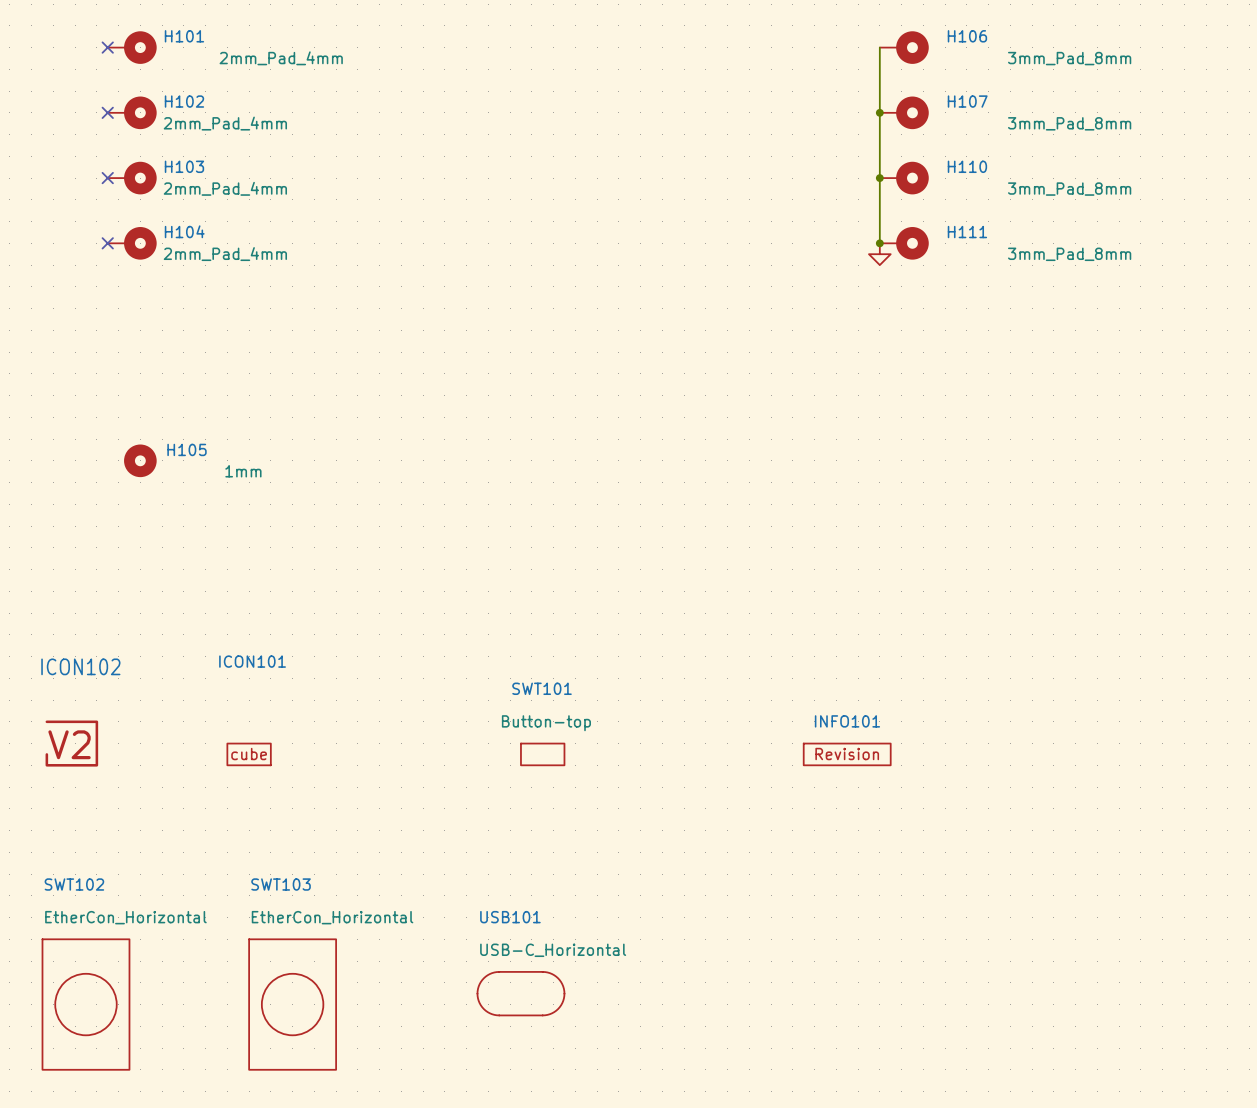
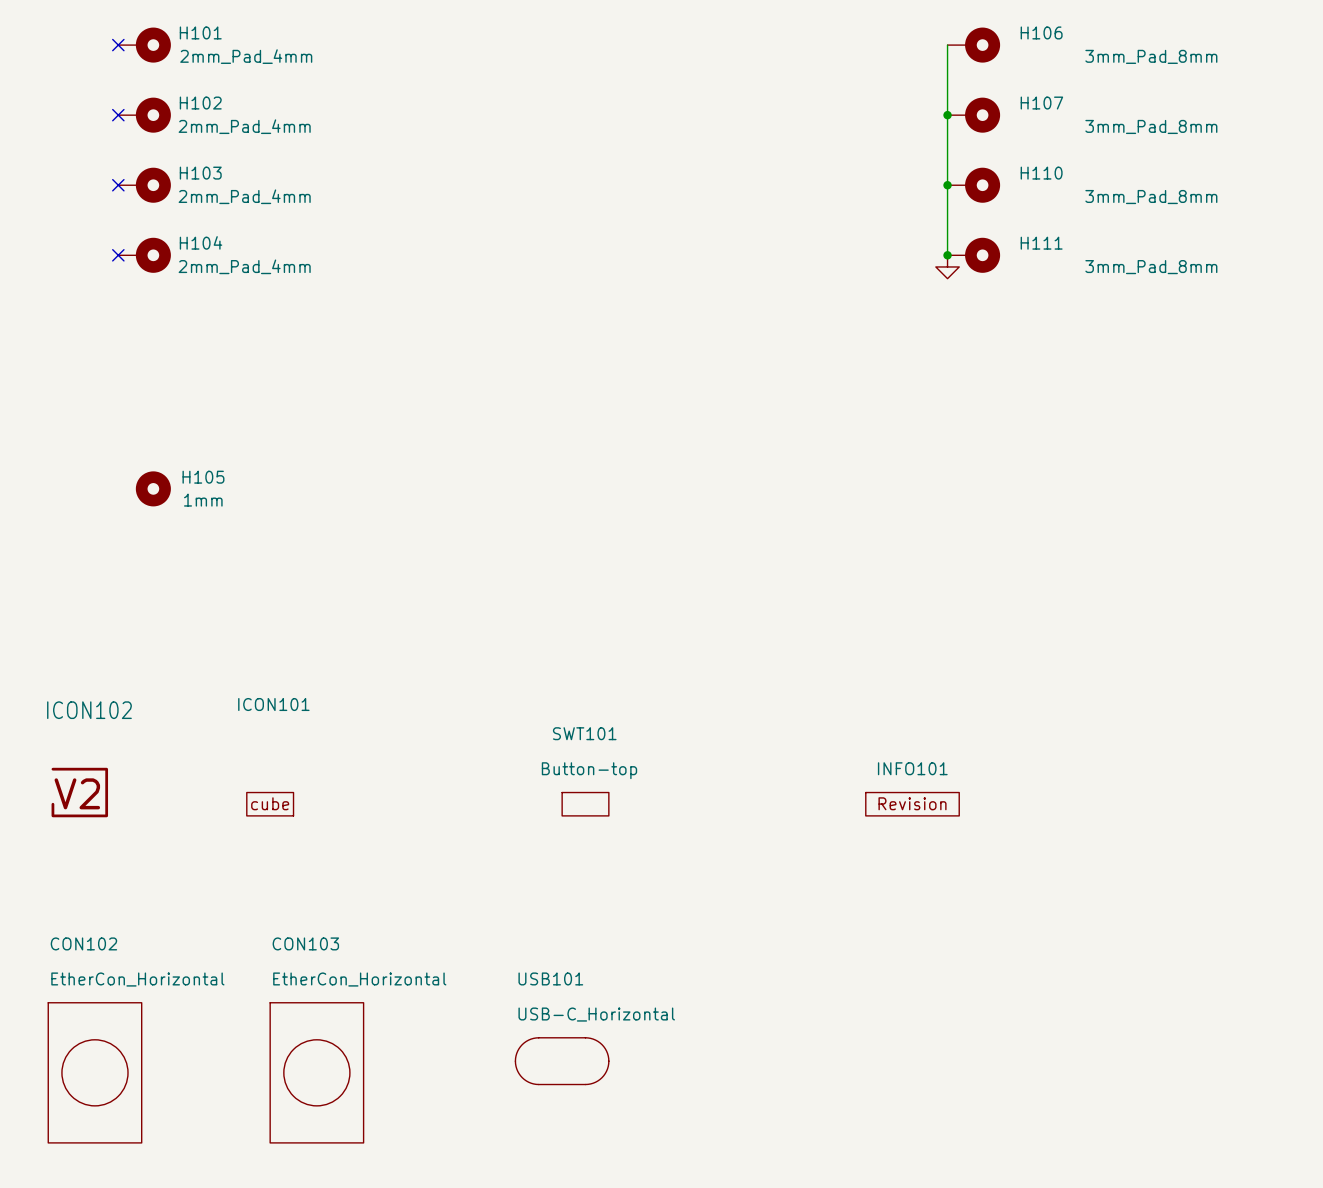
H101 value position: 2mm_Pad_4mm (281, 58) -> 2mm_Pad_4mm (246, 56)
H105 value position: 1mm (243, 471) -> 1mm (203, 500)
SWT102 name: SWT102 (74, 884) -> CON102 (83, 943)
SWT103 name: SWT103 (281, 884) -> CON103 (305, 943)

